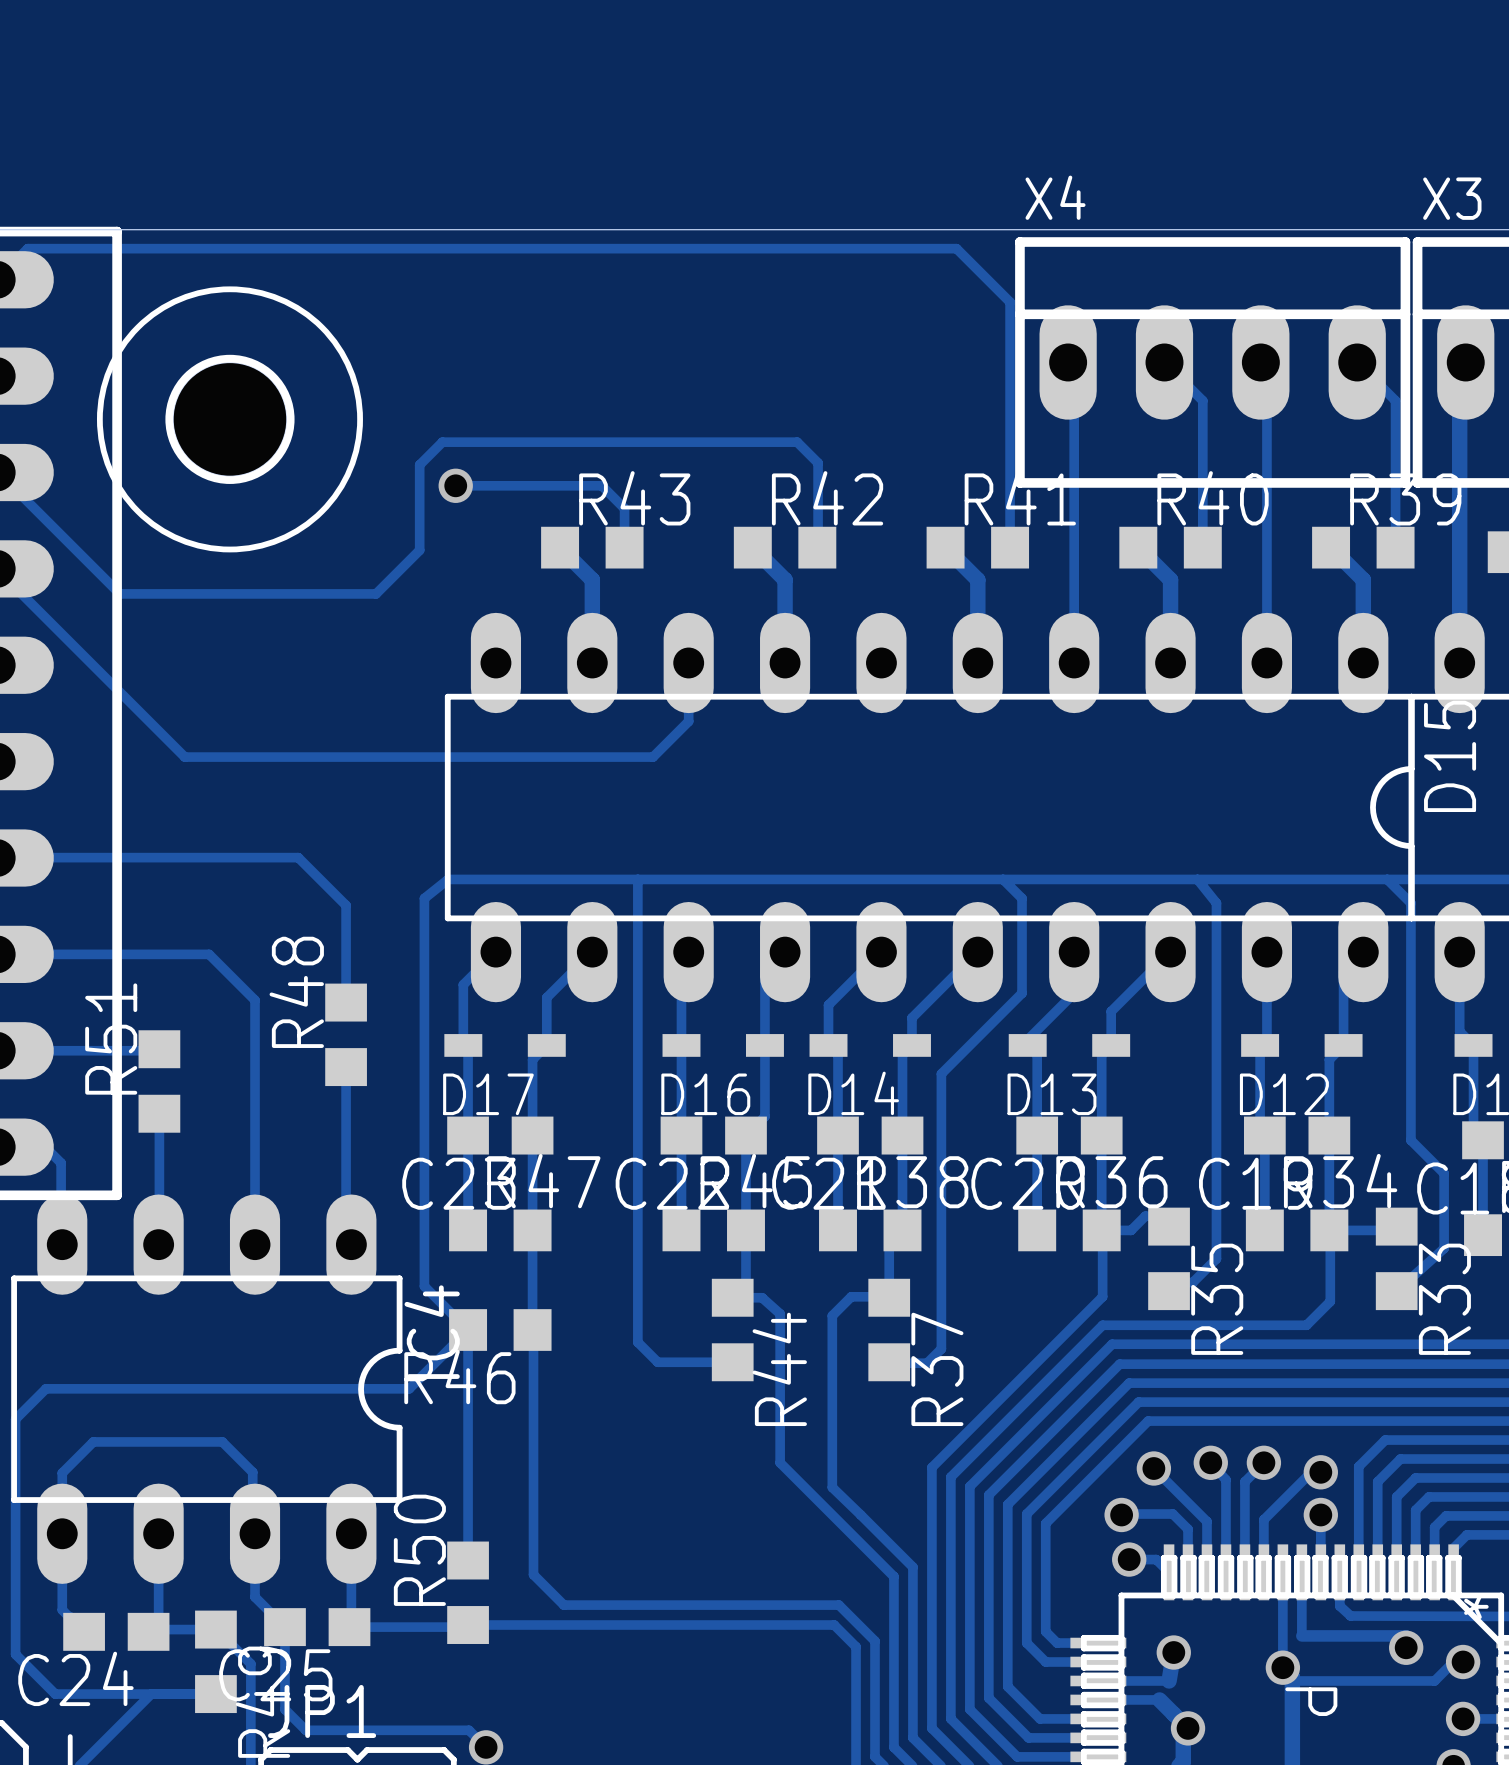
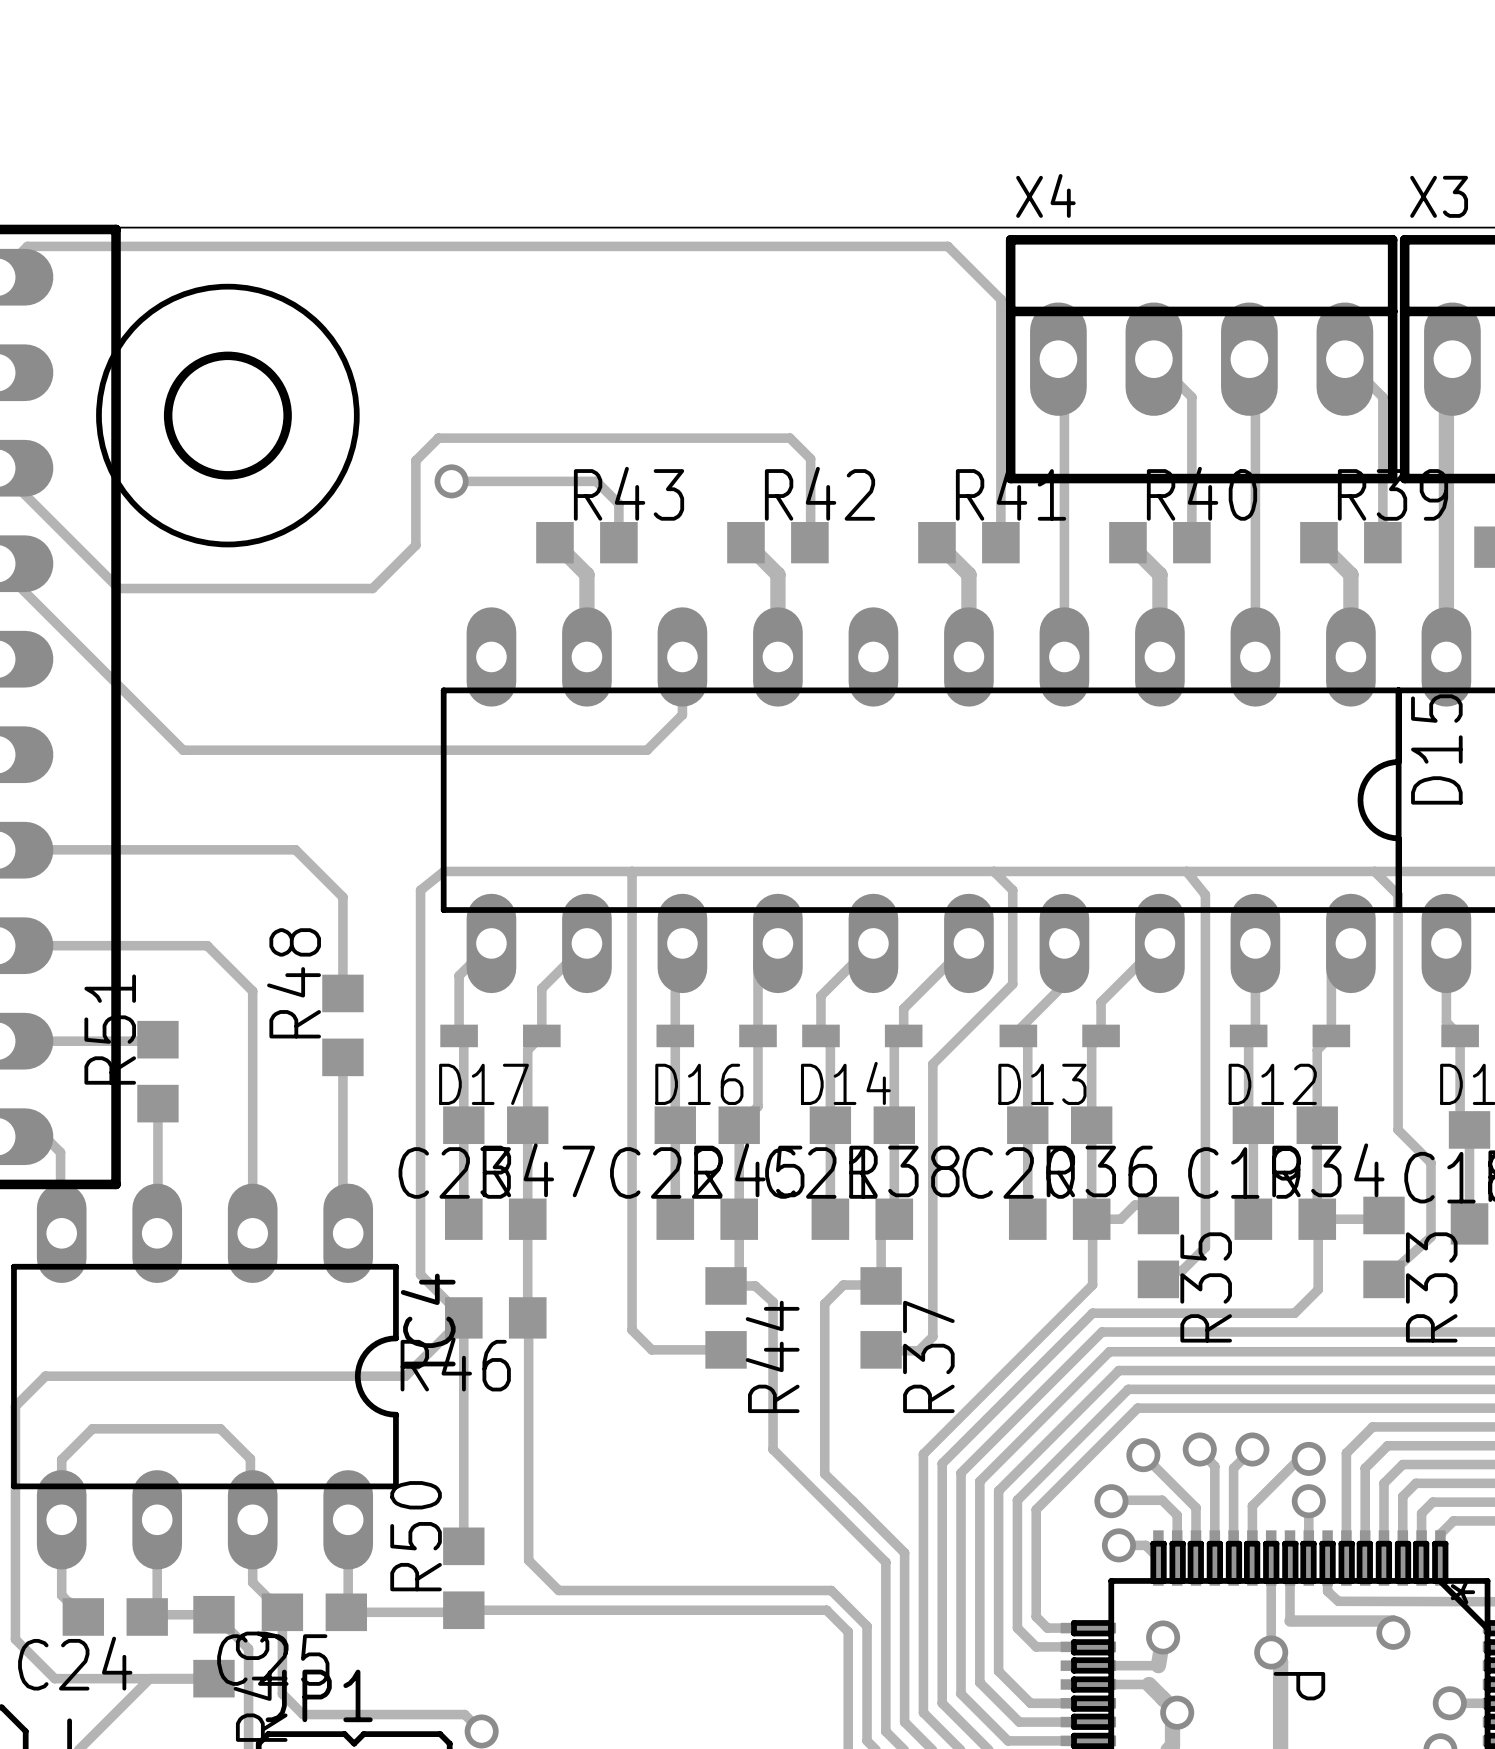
track: (1463, 1662) (1453, 1662) (1434, 1680) (1296, 1680) (1282, 1667) -> none
via: (1463, 1662) -> none

